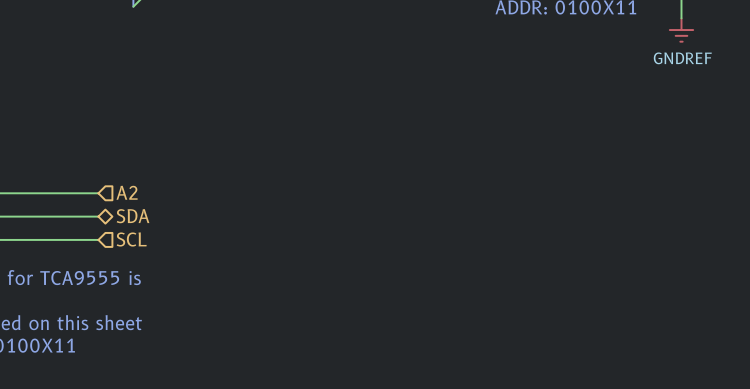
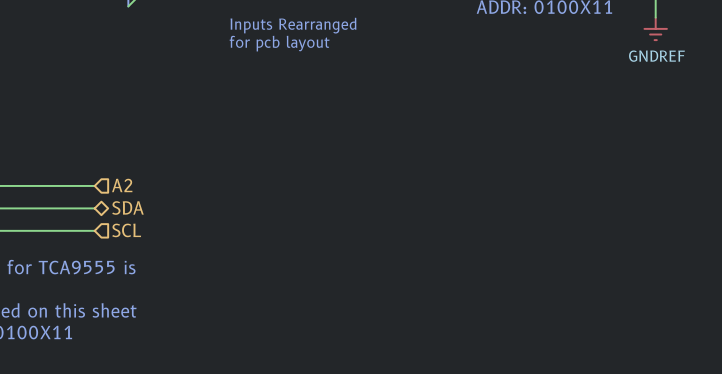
text: none -> Inputs Rearranged (293, 25)
text: none -> for pcb layout (279, 43)

